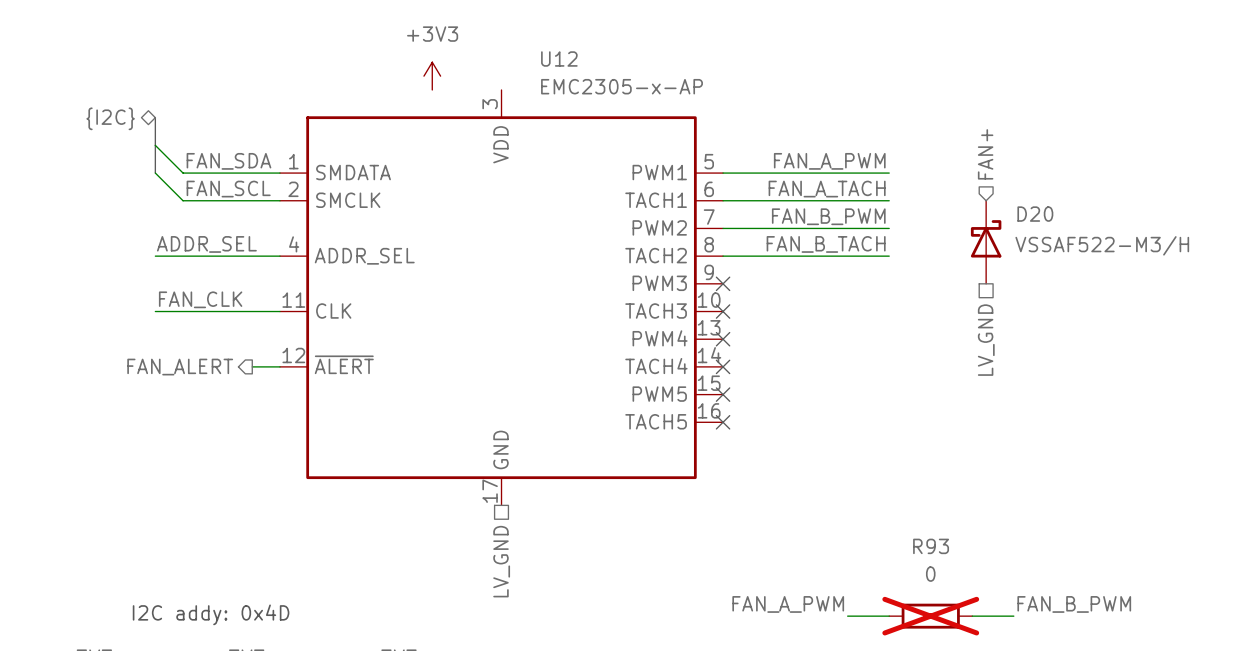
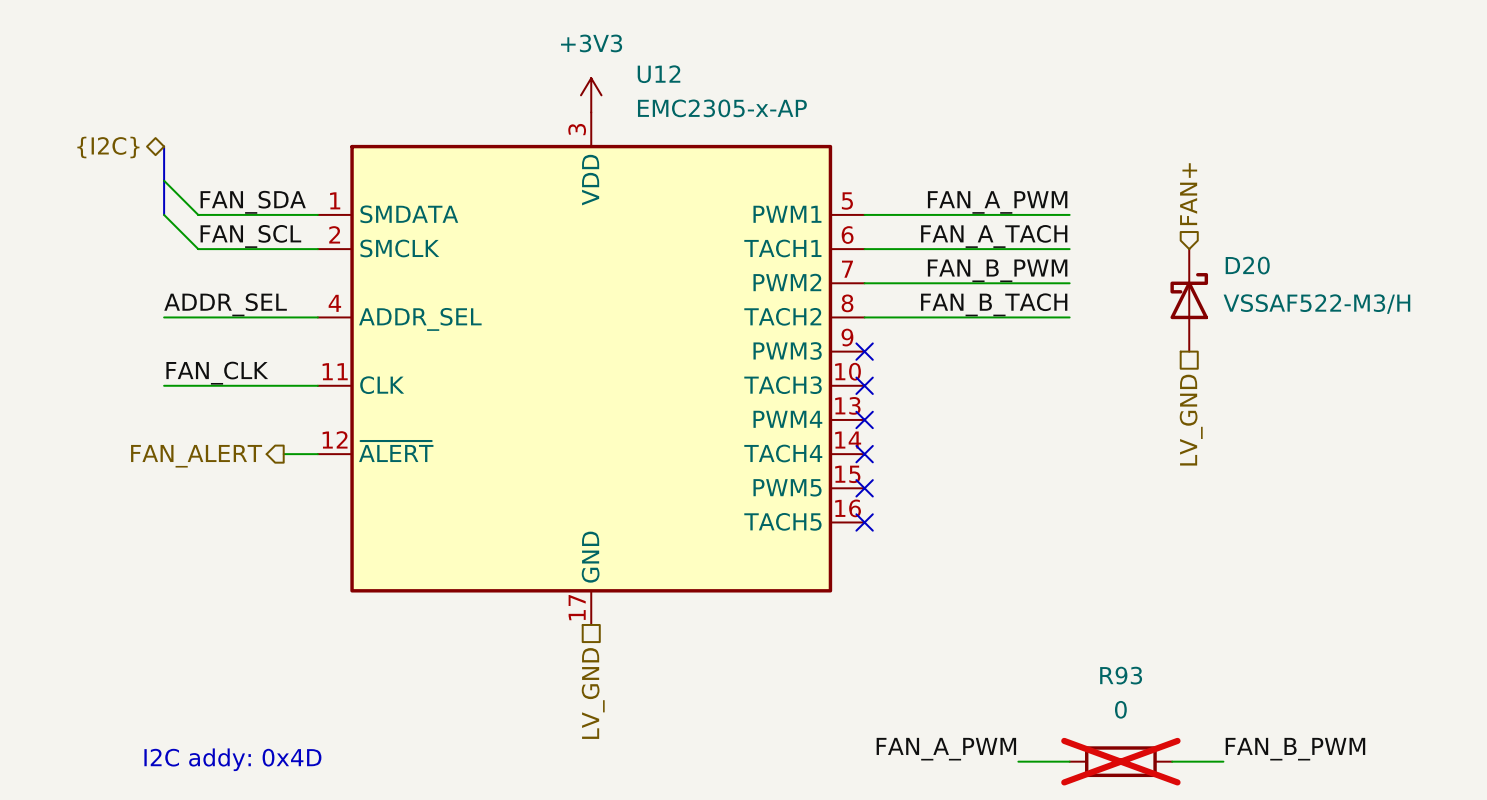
power symbol position: +3V3 (432, 76) -> +3V3 (591, 95)

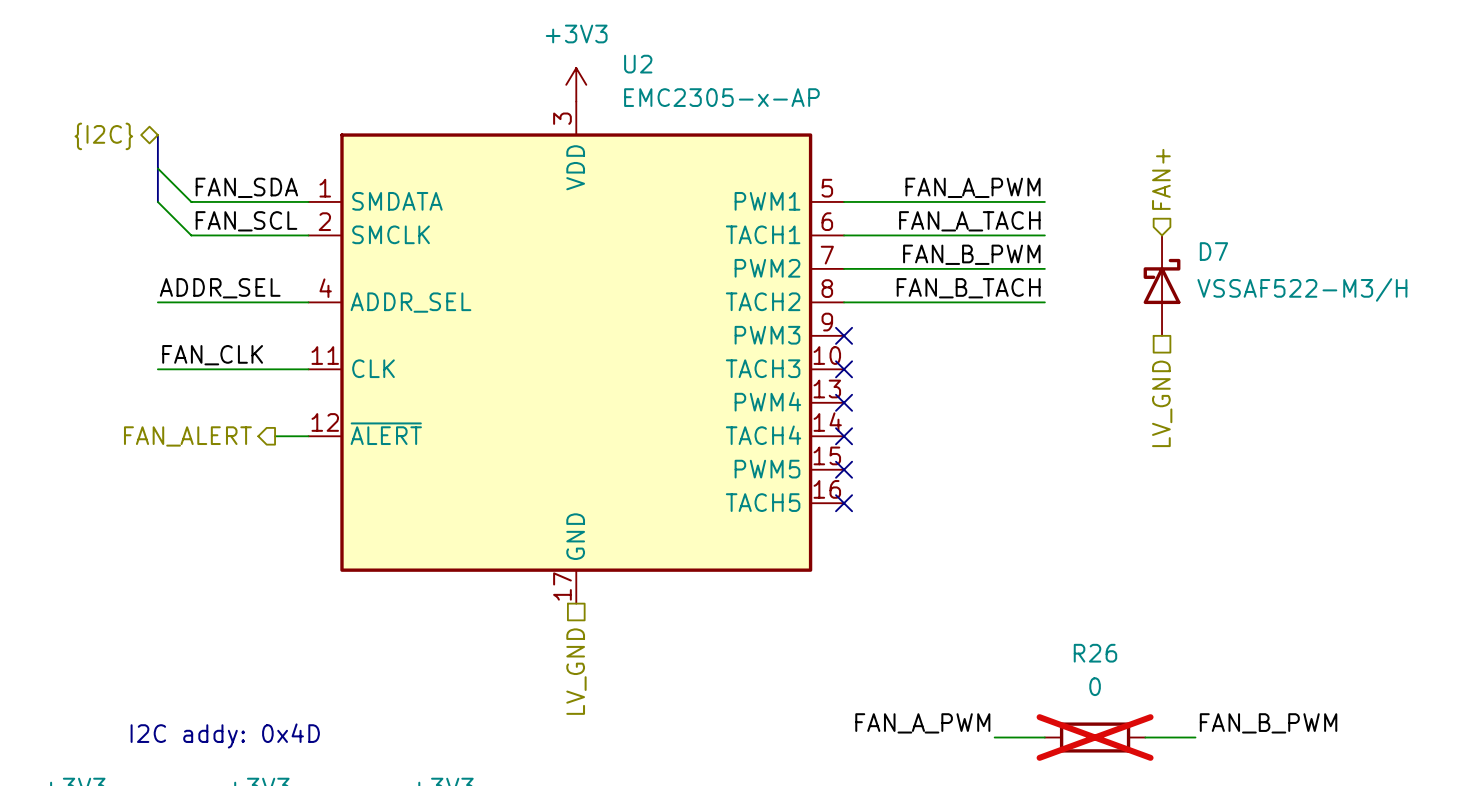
U12 name: U12 (659, 74) -> U2 (638, 64)
D20 name: D20 (1247, 265) -> D7 (1213, 251)
R93 name: R93 (1121, 675) -> R26 (1095, 653)

